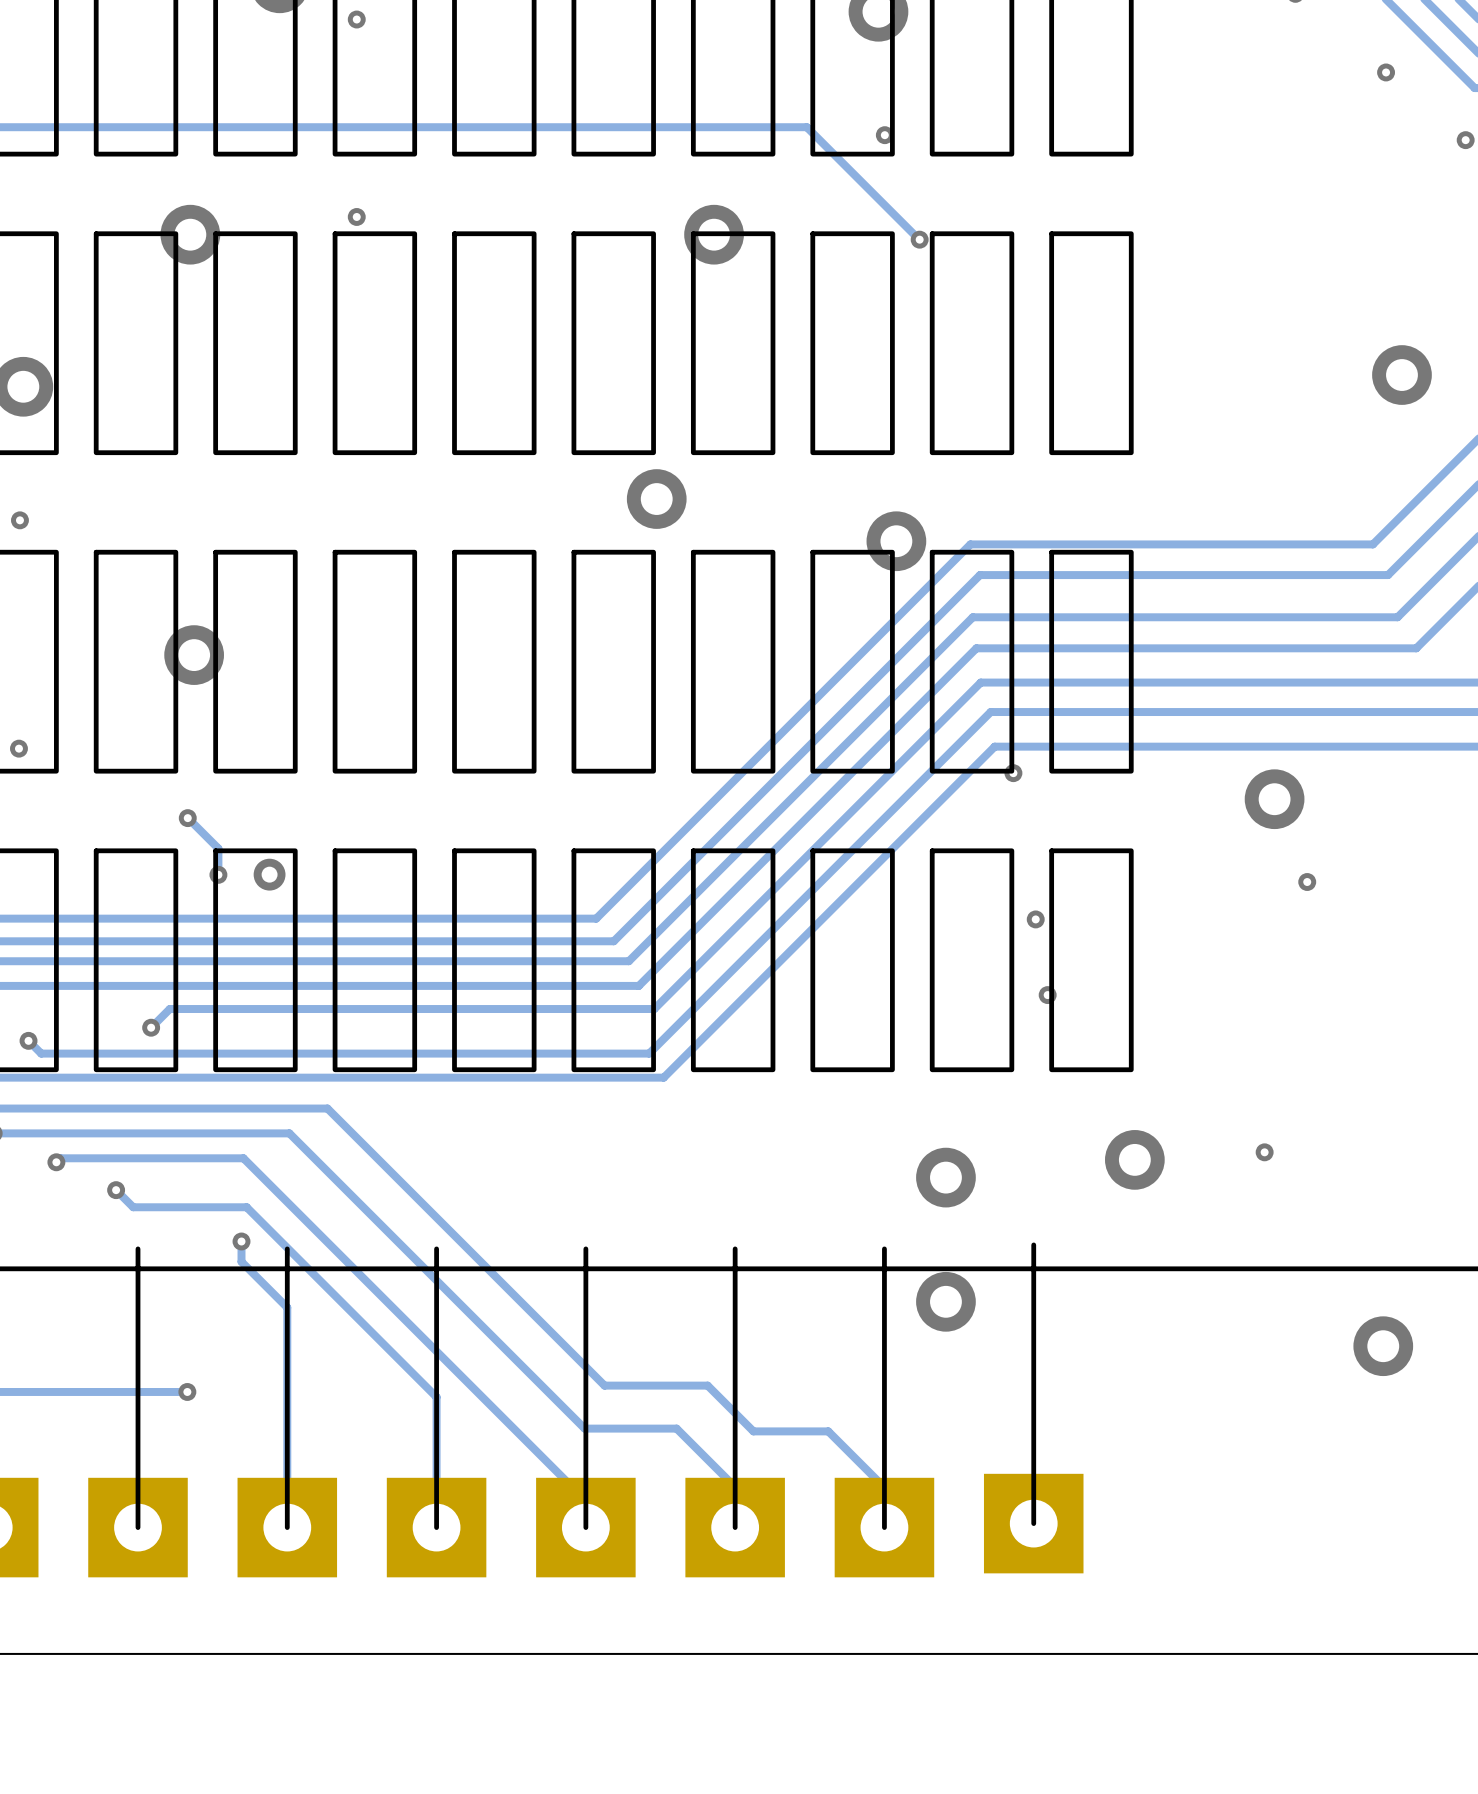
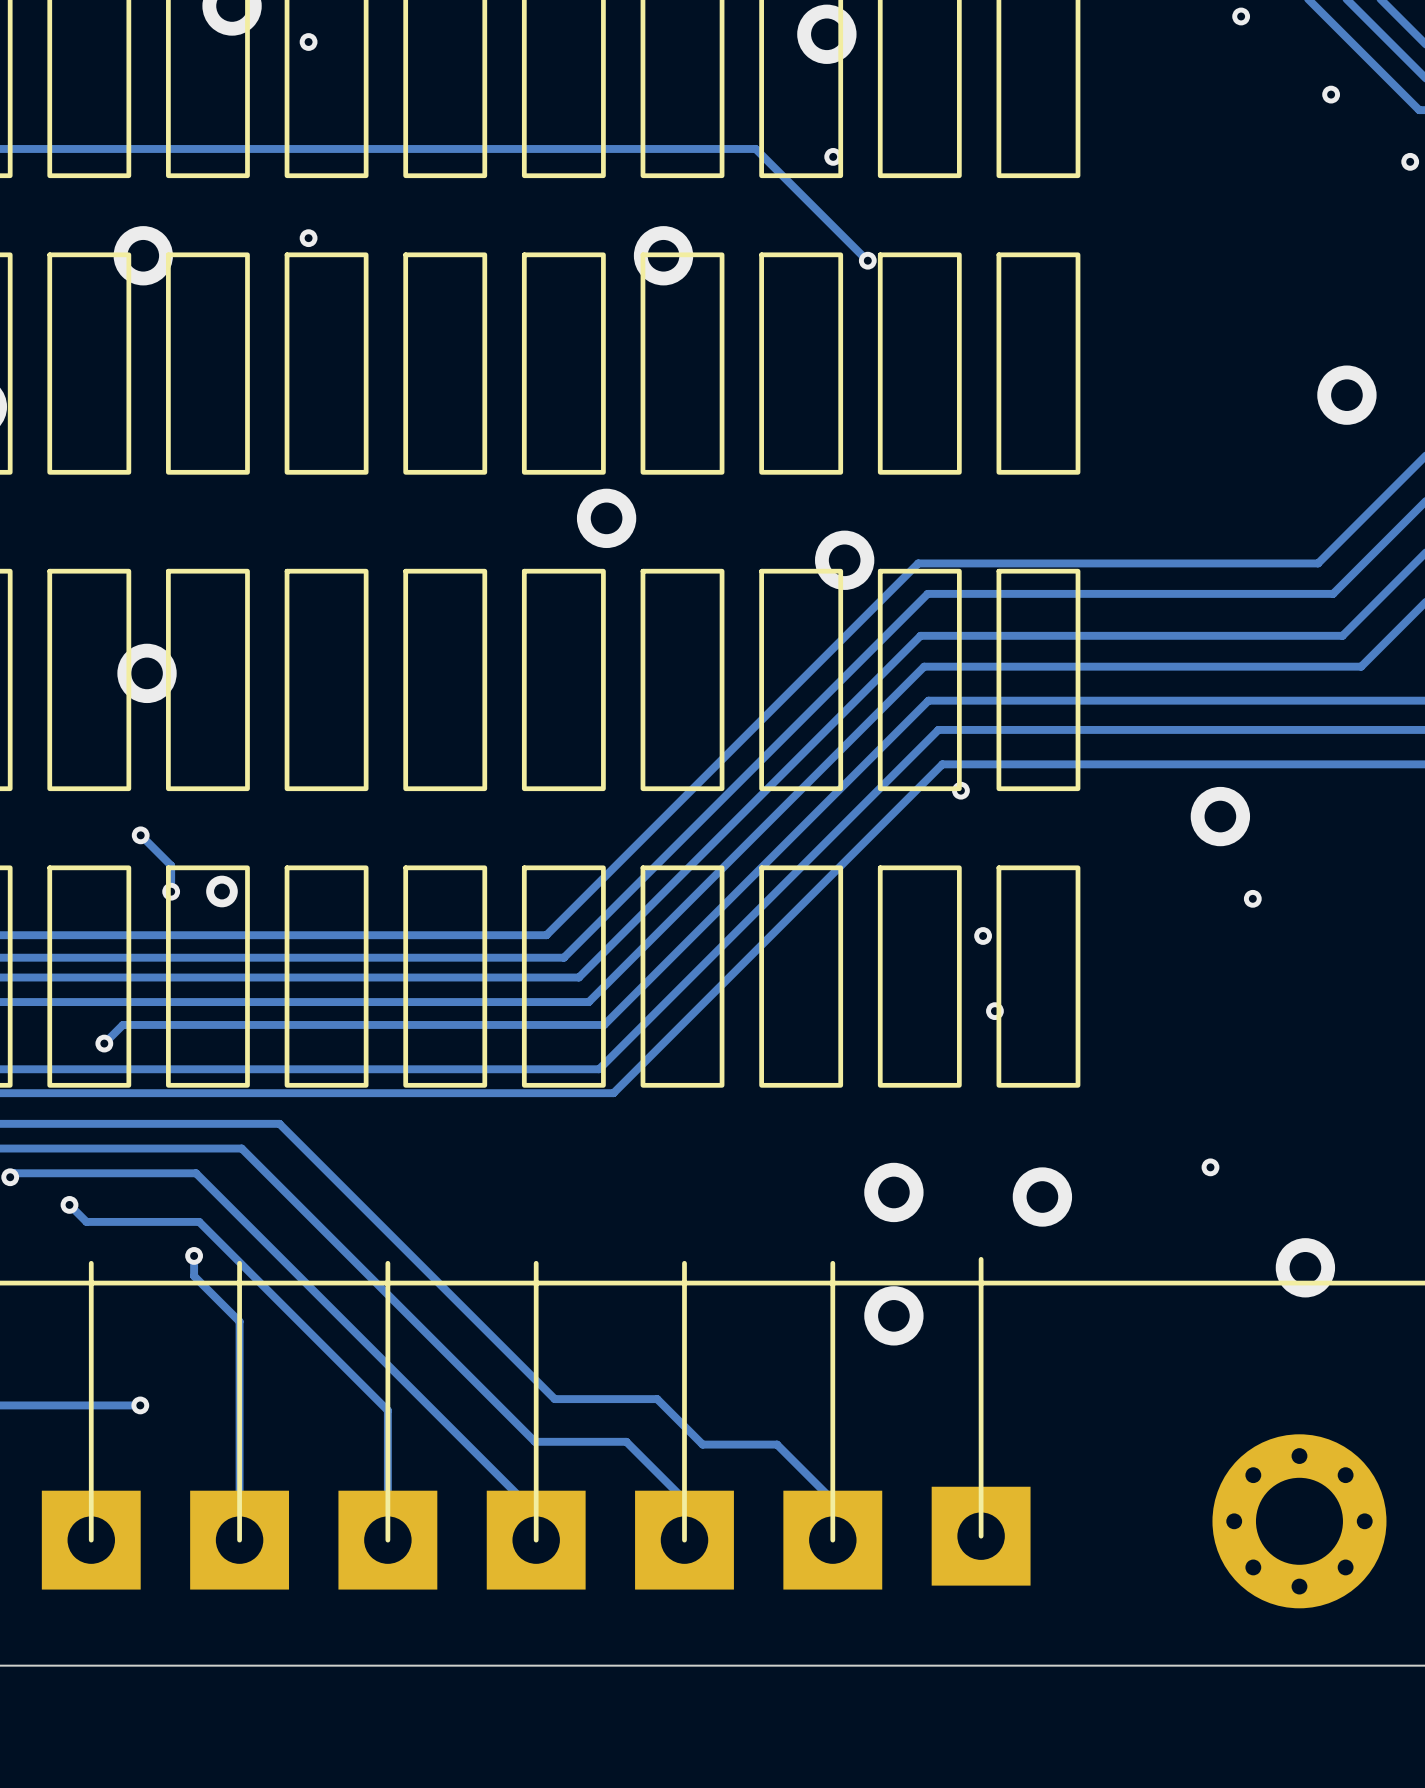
via position: (1134, 1159) -> (1042, 1197)
via position: (1383, 1346) -> (1305, 1267)
part: none -> (1299, 1521)

